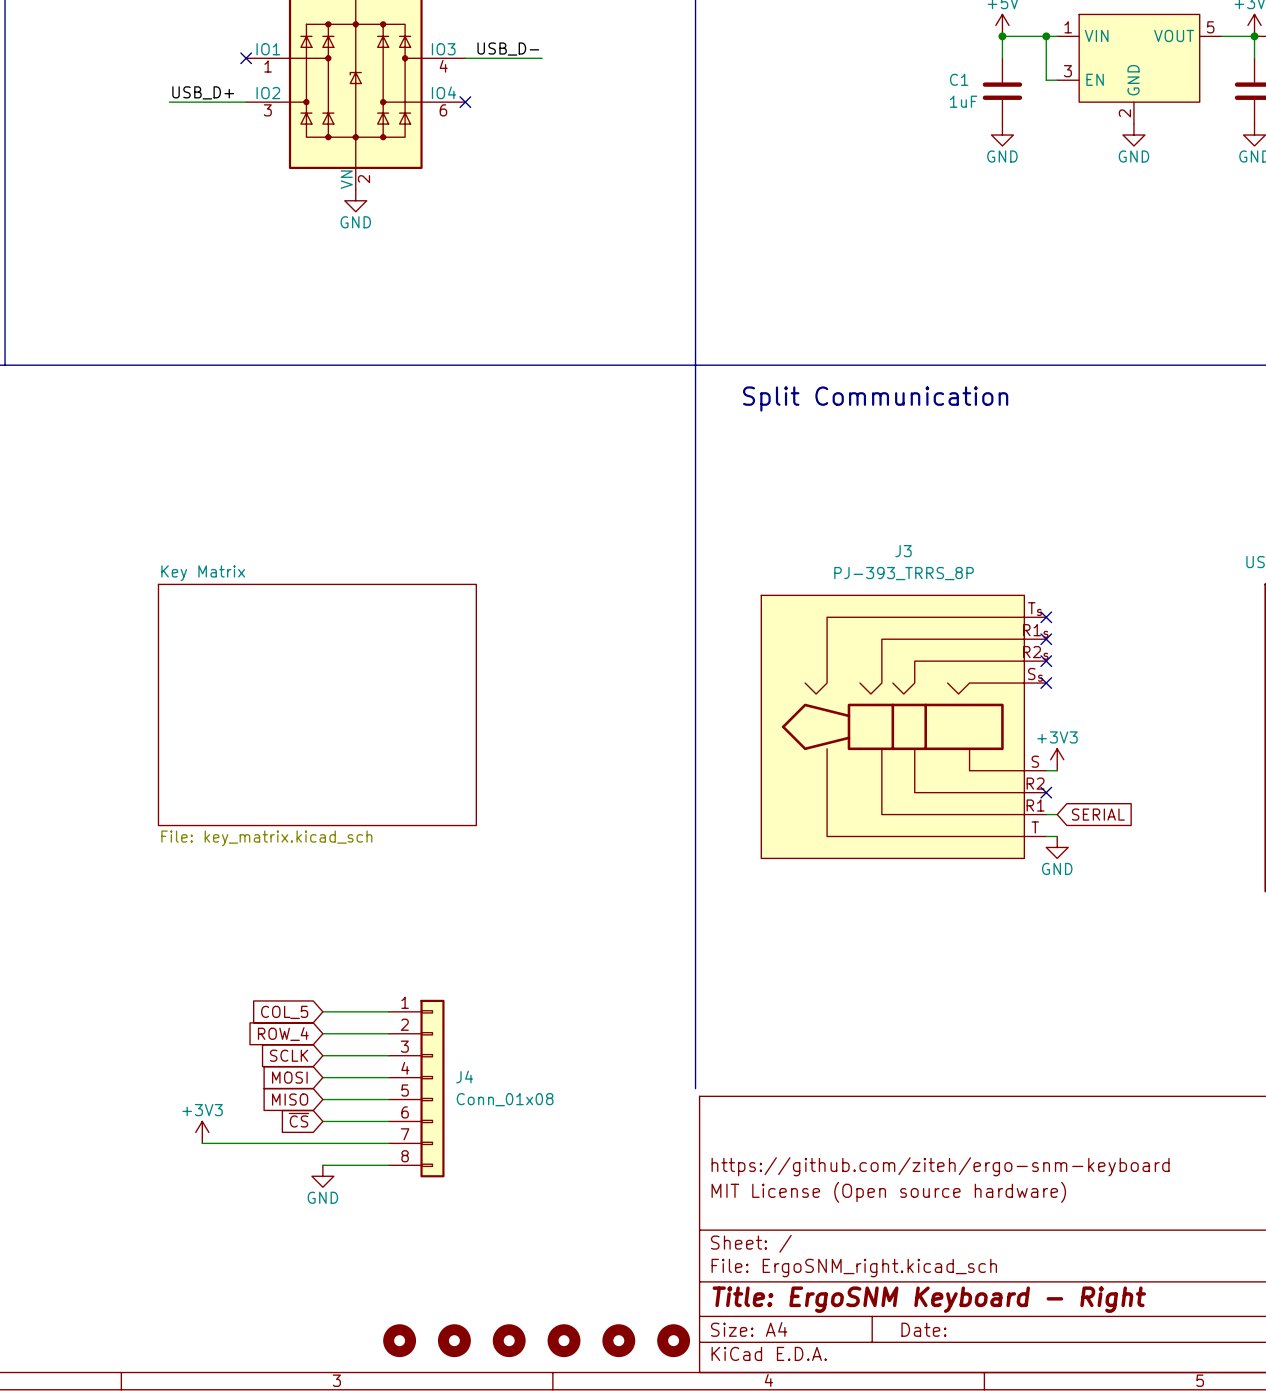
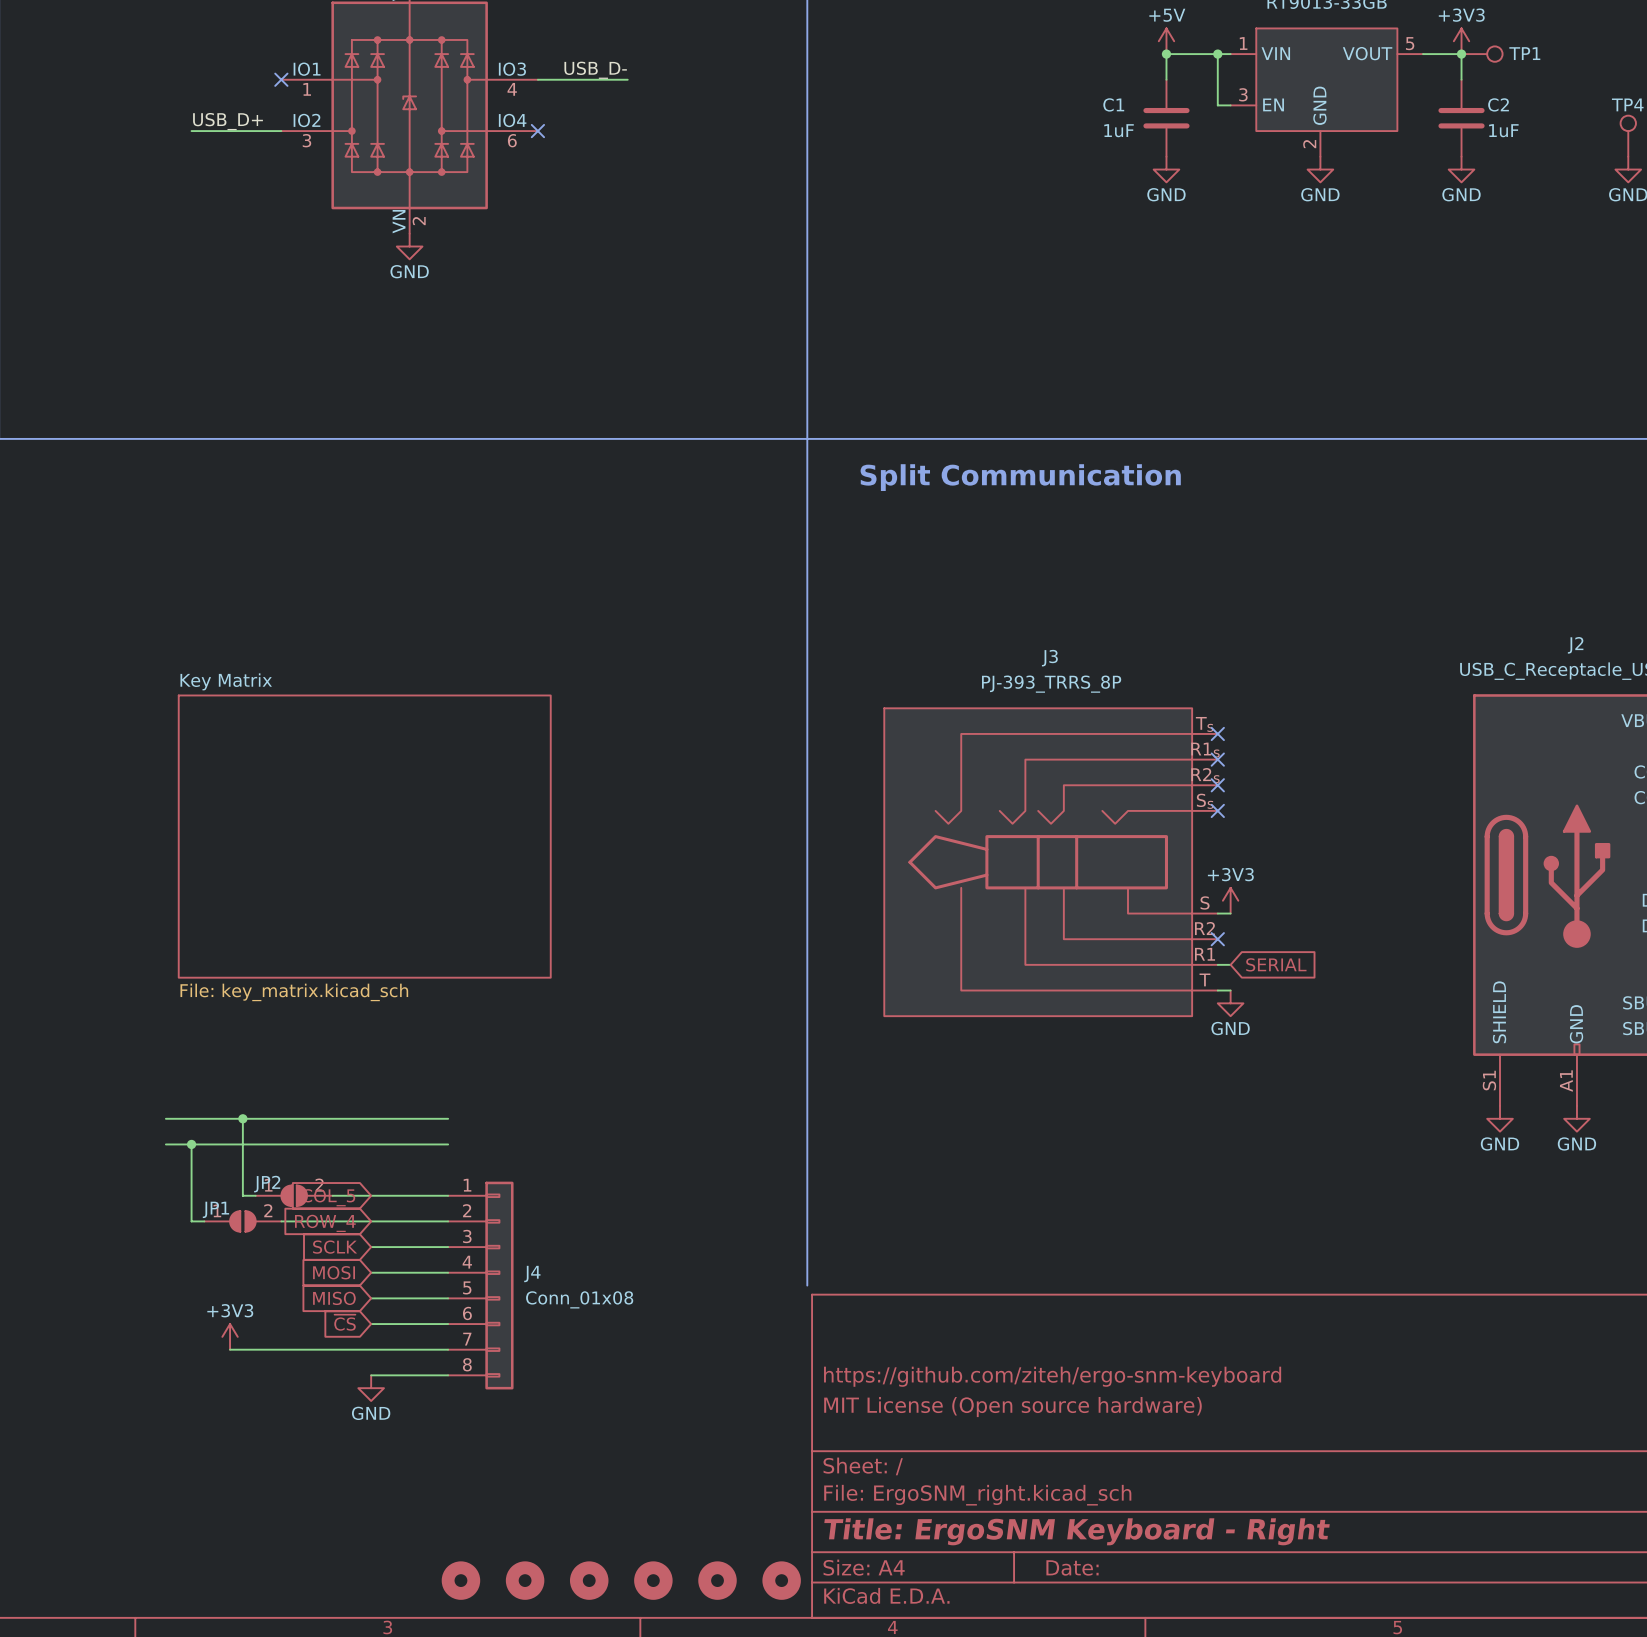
wire: none -> (165, 1118) (448, 1118)
wire: none -> (242, 1118) (242, 1195) (255, 1195)
junction: none -> (242, 1118)
wire: none -> (165, 1144) (448, 1144)
wire: none -> (191, 1144) (191, 1221) (204, 1221)
junction: none -> (191, 1144)
JP2: none -> (294, 1195)
wire: none -> (332, 1195) (371, 1195)
JP1: none -> (242, 1221)
wire: none -> (281, 1221) (371, 1221)

